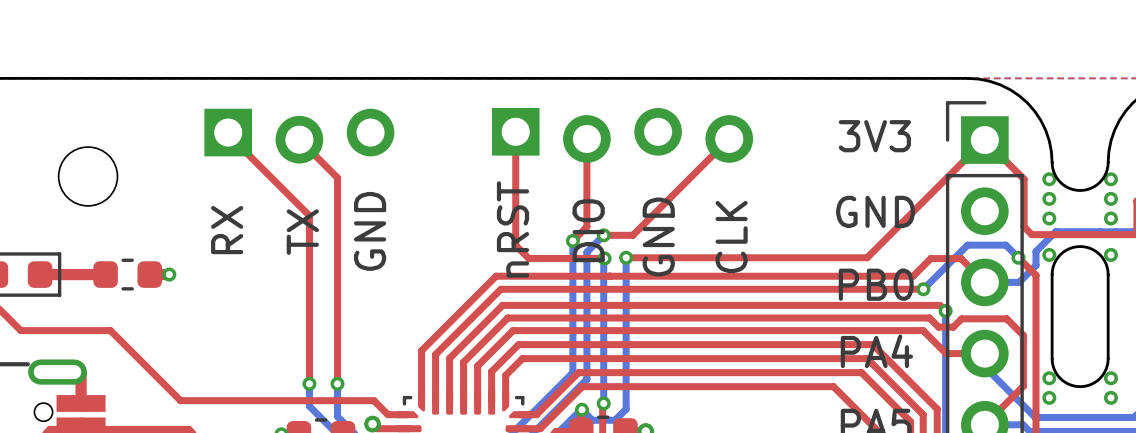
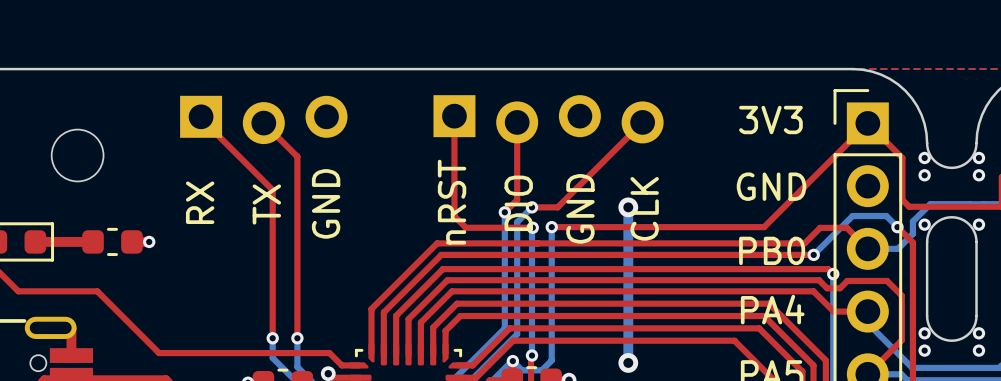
via: (1049, 218) -> none
via: (1110, 218) -> none
bottom track: none -> (628, 207) (628, 362)
via: none -> (628, 207)
via: none -> (628, 362)

